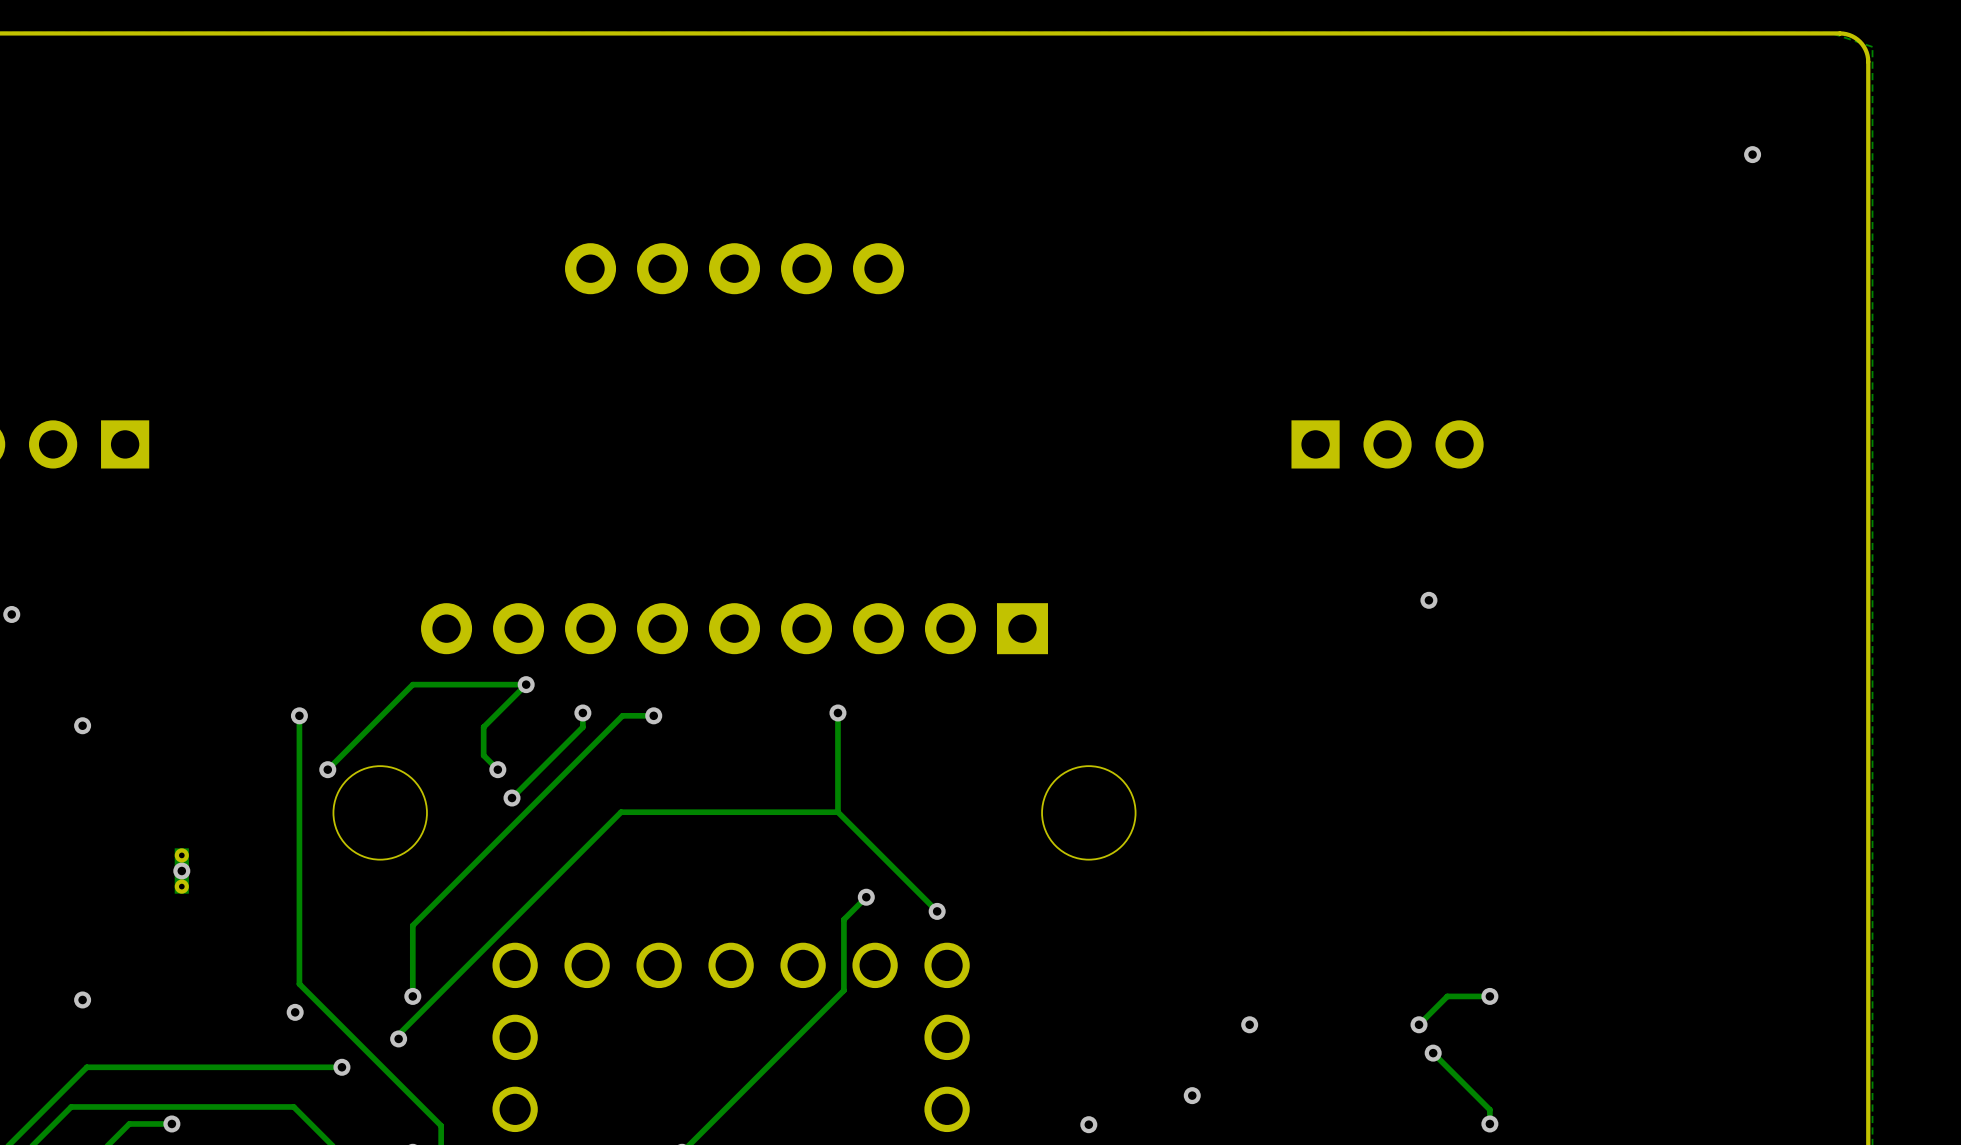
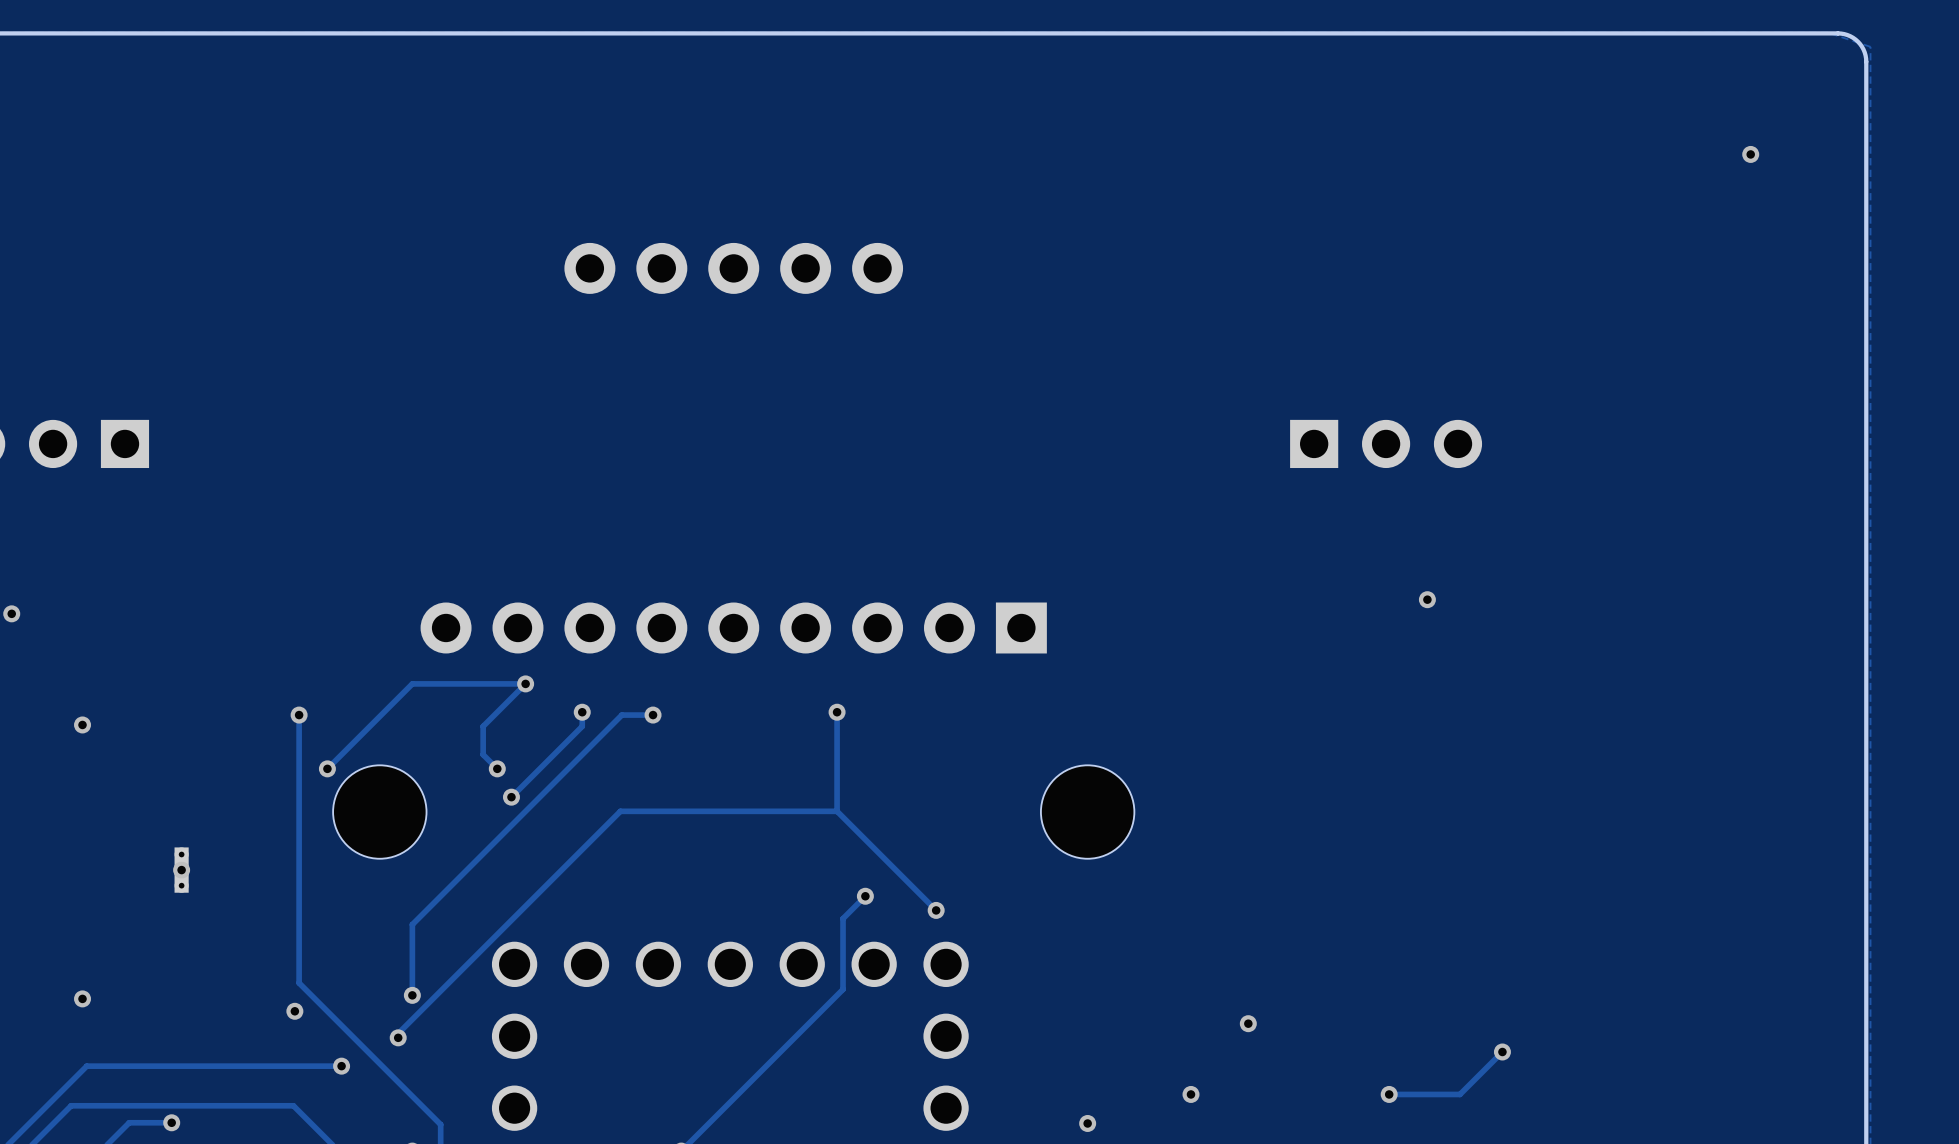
track: (1489, 996) (1447, 996) (1419, 1024) -> none
via: (1489, 996) -> none
via: (1419, 1024) -> none
track: (1433, 1053) (1489, 1109) (1489, 1123) -> none
via: (1433, 1053) -> none
track: none -> (1502, 1051) (1459, 1094) (1389, 1094)
via: none -> (1502, 1051)
via: none -> (1389, 1094)
via: (1489, 1123) -> none

